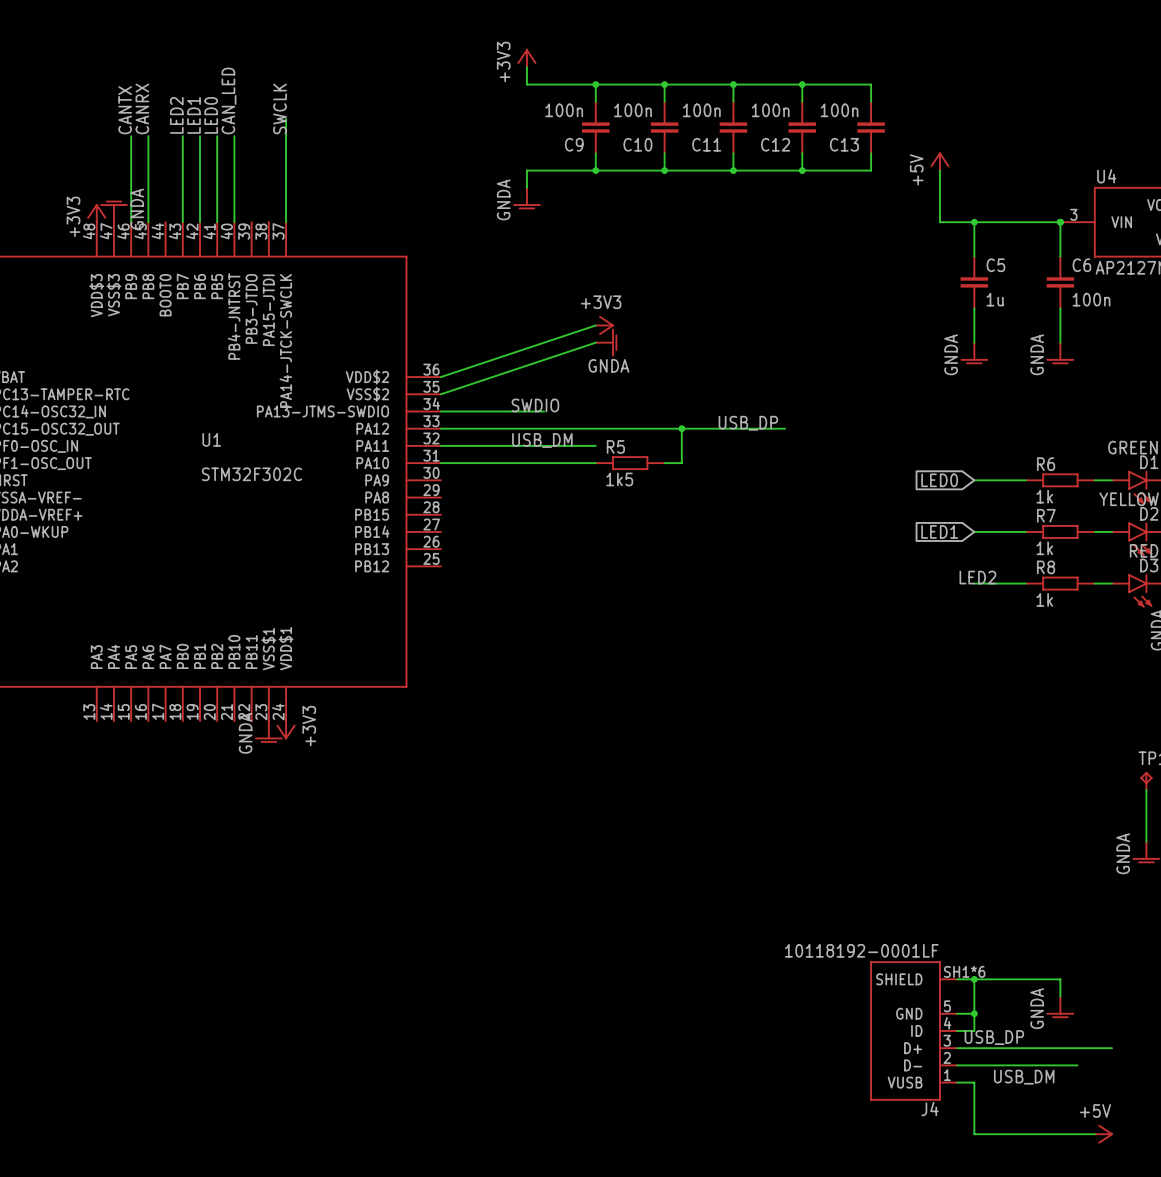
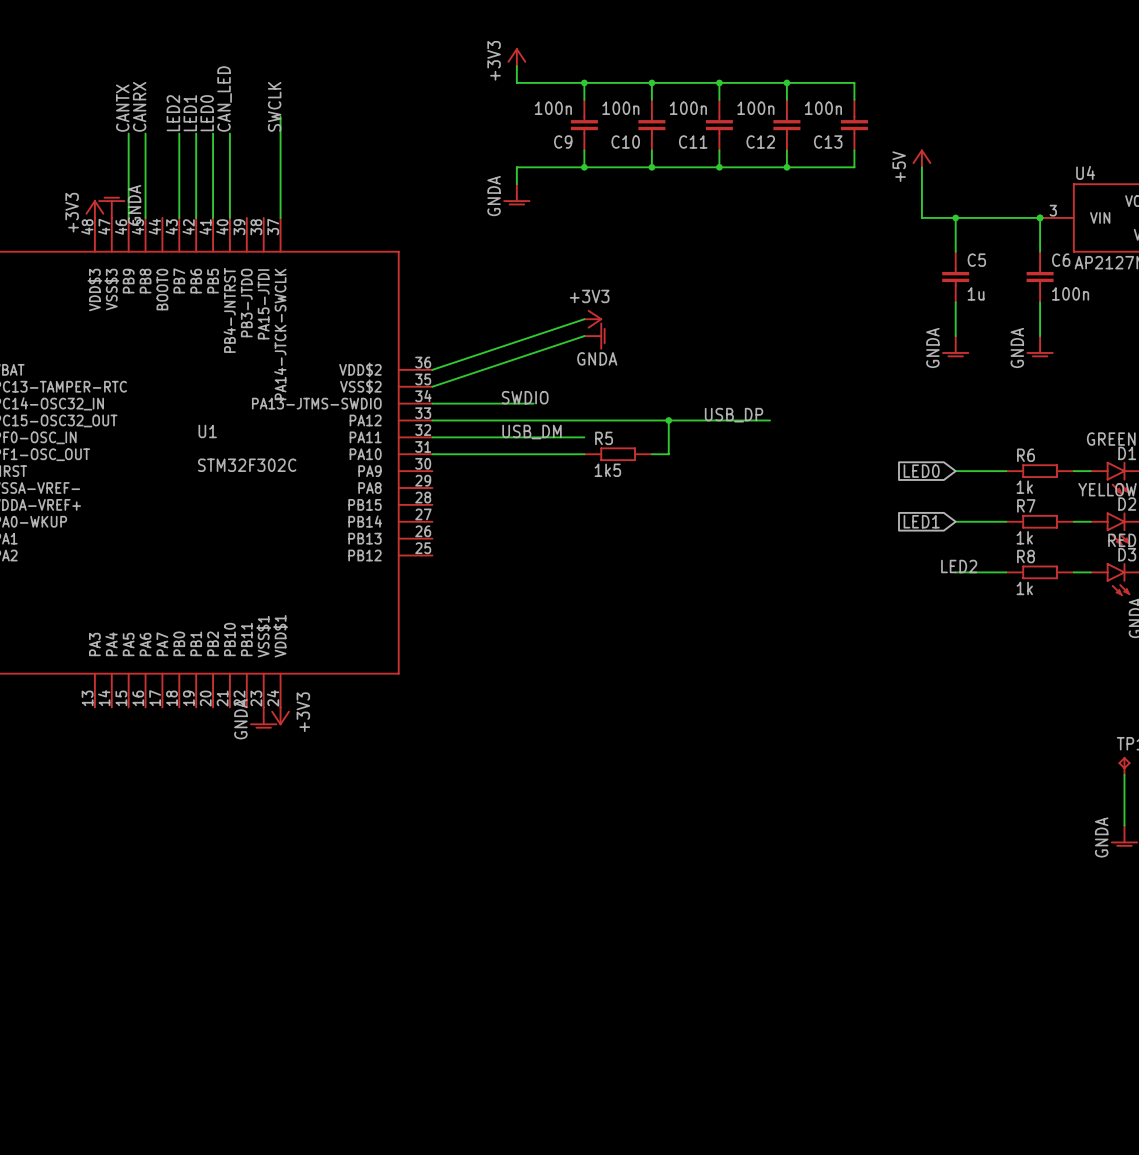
wire: (957, 979) (1060, 979) (1060, 996) -> none
wire: (974, 979) (974, 1030) (957, 1030) -> none
junction: (974, 979) -> none
power symbol: GNDA (1060, 1007) -> none
wire: (957, 1013) (974, 1013) -> none
junction: (974, 1013) -> none
J4: 10118192-0001LF (913, 1030) -> none
label: USB_DP (994, 1037) -> none
wire: (957, 1048) (1112, 1048) -> none
wire: (957, 1065) (1077, 1065) -> none
label: USB_DM (1024, 1077) -> none
wire: (957, 1082) (974, 1082) (974, 1134) (1094, 1134) -> none
power symbol: +5V (1103, 1134) -> none

